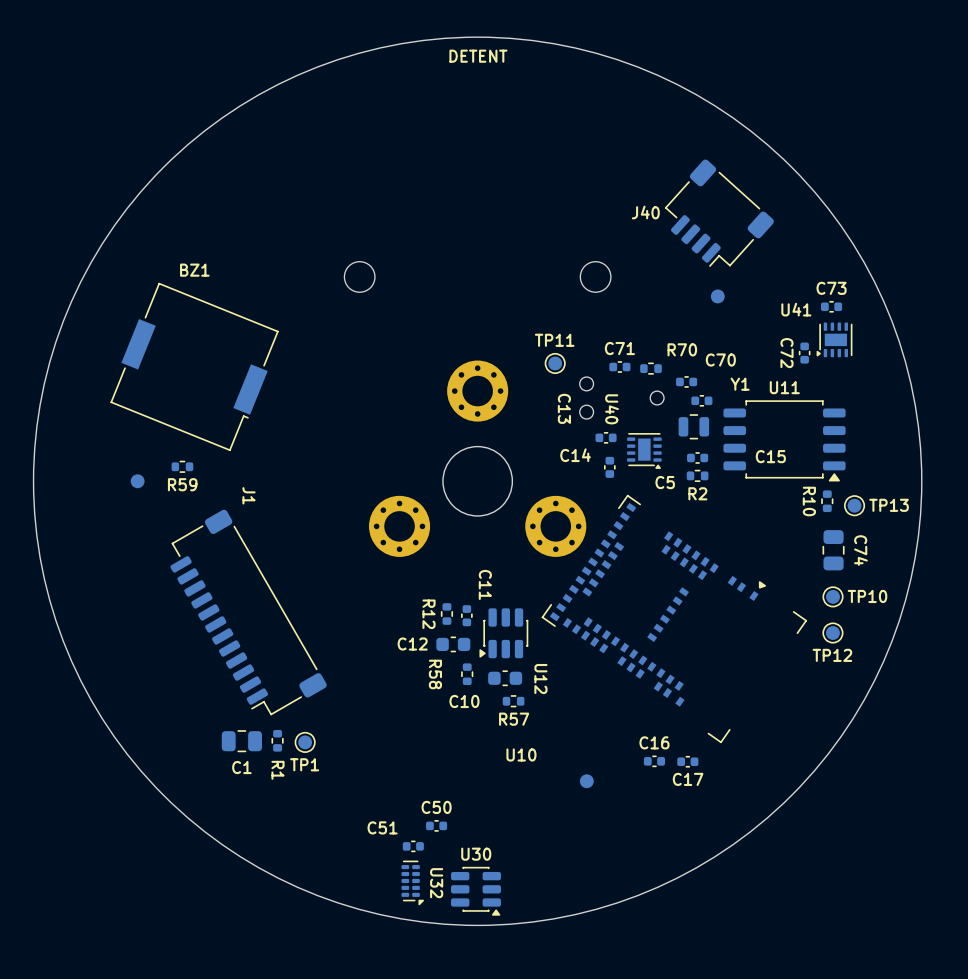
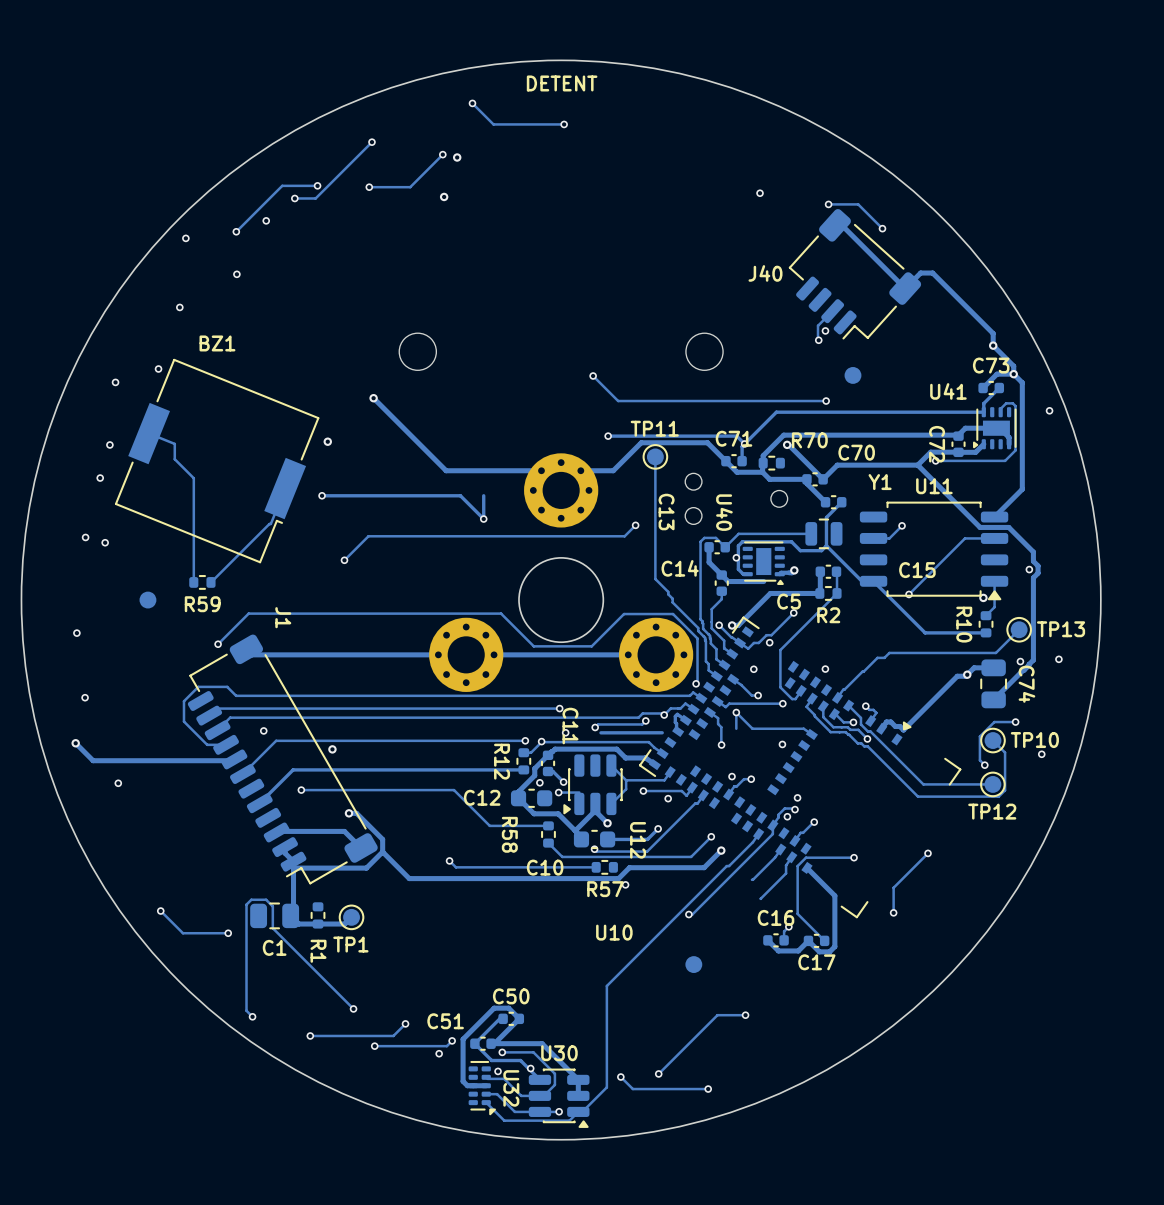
track: none -> (472, 103) (493, 124) (564, 124)
via: none -> (472, 103)
via: none -> (564, 124)
track: none -> (371, 142) (315, 198) (294, 198)
via: none -> (371, 142)
track: none -> (442, 154) (410, 187) (369, 187)
via: none -> (442, 154)
via: none -> (457, 157)
track: none -> (317, 185) (282, 185) (236, 231)
via: none -> (317, 185)
via: none -> (369, 187)
via: none -> (760, 193)
via: none -> (444, 196)
via: none -> (294, 198)
track: none -> (828, 204) (858, 204) (882, 228)
via: none -> (828, 204)
via: none -> (266, 220)
track: none -> (834, 225) (841, 225) (905, 288) (920, 273) (932, 273) (993, 333) (993, 345) (1013, 366) (1013, 374)
via: none -> (882, 228)
via: none -> (236, 231)
via: none -> (185, 238)
via: none -> (236, 274)
via: none -> (179, 307)
track: none -> (832, 311) (818, 325) (818, 340)
via: none -> (825, 330)
via: none -> (818, 340)
via: none -> (993, 345)
via: none -> (158, 369)
track: none -> (1013, 374) (1022, 382) (1022, 489) (994, 517)
track: none -> (1013, 374) (996, 374) (983, 388)
via: none -> (1013, 374)
track: none -> (593, 375) (618, 401) (826, 401)
via: none -> (593, 375)
via: none -> (115, 382)
track: none -> (999, 388) (983, 403) (983, 412) (776, 412) (742, 446) (742, 461)
track: none -> (373, 398) (446, 470) (541, 470) (549, 462) (561, 462)
via: none -> (373, 398)
via: none -> (826, 401)
via: none -> (1049, 410)
track: none -> (1000, 412) (1000, 408) (1006, 403) (1012, 403) (1015, 406) (1015, 450) (1005, 460) (935, 460)
track: none -> (149, 433) (174, 443) (174, 459) (193, 478) (193, 582)
track: none -> (958, 435) (783, 435) (763, 455) (762, 472)
track: none -> (958, 435) (965, 428) (999, 428) (1009, 437) (1009, 444)
track: none -> (608, 436) (736, 436) (744, 443)
via: none -> (608, 436)
via: none -> (327, 441)
via: none -> (744, 443)
via: none -> (109, 444)
track: none -> (787, 444) (823, 479) (837, 465) (917, 465)
via: none -> (787, 444)
track: none -> (983, 444) (975, 452) (958, 452)
track: none -> (958, 452) (930, 452) (917, 465)
track: none -> (655, 456) (655, 579) (668, 591) (672, 602) (698, 628) (698, 630) (705, 637) (705, 661) (708, 664) (708, 670) (716, 676)
via: none -> (935, 460)
track: none -> (917, 465) (980, 527) (1008, 527) (1033, 552) (1033, 561) (1038, 565) (1038, 573) (1033, 577) (1033, 660) (993, 699)
track: none -> (580, 470) (613, 470) (641, 442) (707, 442) (736, 472) (762, 472)
track: none -> (762, 472) (769, 479) (806, 479) (806, 483) (825, 502)
via: none -> (100, 478)
track: none -> (285, 488) (270, 523) (211, 582)
via: none -> (322, 495)
track: none -> (483, 495) (483, 519) (460, 495) (322, 495)
track: none -> (841, 502) (826, 517) (826, 545)
via: none -> (483, 519)
track: none -> (635, 525) (624, 536) (368, 536) (344, 560)
via: none -> (635, 525)
track: none -> (902, 525) (889, 538) (873, 538)
via: none -> (902, 525)
track: none -> (811, 533) (738, 533) (725, 547) (715, 537) (704, 537) (700, 541) (700, 619) (703, 628) (710, 635) (710, 643) (716, 649) (716, 659) (724, 665)
via: none -> (85, 537)
track: none -> (994, 538) (965, 538) (909, 594)
via: none -> (105, 542)
track: none -> (826, 545) (821, 550) (800, 550) (791, 541) (742, 541) (738, 545) (738, 569) (743, 574) (747, 574)
track: none -> (826, 545) (861, 581) (873, 581) (925, 632) (986, 632)
track: none -> (709, 547) (709, 562) (728, 581) (763, 581)
via: none -> (736, 557)
via: none -> (344, 560)
track: none -> (794, 570) (791, 572) (779, 574)
via: none -> (794, 570)
via: none -> (1029, 569)
track: none -> (820, 571) (819, 593) (770, 593) (738, 625) (732, 625)
track: none -> (836, 571) (837, 593) (780, 650) (780, 687) (792, 699) (795, 699) (801, 690)
track: none -> (994, 581) (994, 607) (986, 615)
track: none -> (721, 591) (721, 599) (711, 609) (711, 628) (724, 640) (724, 648) (732, 654)
via: none -> (909, 594)
via: none -> (983, 597)
track: none -> (793, 612) (771, 635) (766, 635) (758, 642) (753, 642) (748, 648) (731, 637) (719, 625)
via: none -> (793, 612)
via: none -> (719, 625)
via: none -> (732, 625)
track: none -> (1019, 629) (995, 652) (889, 652) (884, 657) (877, 657) (843, 689) (837, 697)
via: none -> (76, 633)
via: none -> (769, 642)
track: none -> (218, 644) (248, 613) (501, 613) (533, 646) (591, 646) (624, 614) (673, 614) (697, 638) (696, 683)
via: none -> (218, 644)
track: none -> (246, 649) (251, 654) (466, 654)
track: none -> (656, 654) (494, 654)
via: none -> (1058, 659)
via: none -> (1020, 661)
track: none -> (993, 667) (974, 667) (965, 676) (957, 676) (903, 730) (890, 721) (886, 721) (881, 728)
via: none -> (753, 669)
via: none -> (825, 669)
via: none -> (967, 674)
track: none -> (733, 679) (751, 695) (758, 695)
via: none -> (696, 683)
via: none -> (758, 695)
via: none -> (85, 697)
track: none -> (701, 698) (693, 692) (689, 695) (236, 695) (227, 686) (198, 686) (183, 701) (183, 721) (207, 744) (226, 744)
track: none -> (812, 698) (806, 706) (830, 732) (845, 732) (857, 743) (867, 746) (917, 796) (998, 796) (1005, 790) (1005, 752) (992, 740)
track: none -> (717, 701) (725, 707) (729, 703) (782, 703)
via: none -> (782, 703)
track: none -> (823, 706) (823, 717) (833, 727) (858, 729) (867, 738)
track: none -> (848, 705) (860, 717) (860, 724) (867, 731) (870, 731) (923, 784) (992, 784)
track: none -> (865, 706) (876, 712) (870, 721)
via: none -> (865, 706)
track: none -> (559, 708) (216, 708) (209, 715)
via: none -> (559, 708)
track: none -> (693, 709) (685, 703) (680, 708) (670, 708) (664, 715) (642, 713) (638, 717) (230, 717) (217, 730)
track: none -> (709, 712) (718, 718) (718, 724) (721, 727) (721, 744)
via: none -> (736, 712)
via: none -> (664, 715)
track: none -> (834, 714) (843, 722) (853, 722)
track: none -> (645, 720) (642, 724) (598, 724) (595, 727)
via: none -> (645, 720)
track: none -> (685, 720) (677, 714) (675, 716) (678, 731)
via: none -> (853, 722)
track: none -> (1015, 722) (994, 722) (979, 736) (979, 760) (984, 765)
via: none -> (1015, 722)
via: none -> (595, 727)
track: none -> (736, 728) (736, 712) (752, 728) (803, 728) (811, 734)
via: none -> (263, 730)
via: none -> (565, 732)
track: none -> (662, 732) (600, 732)
via: none -> (867, 738)
track: none -> (525, 740) (276, 740) (242, 774)
via: none -> (525, 740)
via: none -> (541, 741)
track: none -> (541, 742) (531, 752) (523, 752)
track: none -> (541, 742) (648, 742) (662, 753)
track: none -> (75, 743) (93, 760) (234, 759)
via: none -> (75, 743)
via: none -> (721, 745)
via: none -> (782, 744)
via: none -> (332, 749)
via: none -> (1041, 754)
track: none -> (654, 764) (645, 757) (625, 757) (616, 749) (555, 749) (534, 768) (534, 775) (518, 791) (518, 798) (534, 813) (558, 813) (581, 837) (581, 839)
track: none -> (611, 765) (626, 780)
via: none -> (984, 765)
track: none -> (523, 769) (293, 769) (259, 803)
track: none -> (548, 771) (552, 771) (563, 782)
track: none -> (670, 772) (664, 780) (626, 780)
via: none -> (732, 776)
track: none -> (751, 779) (744, 779) (734, 786) (728, 794)
via: none -> (751, 779)
track: none -> (626, 780) (626, 789) (611, 803)
via: none -> (539, 782)
via: none -> (563, 782)
via: none -> (118, 783)
track: none -> (692, 787) (686, 795) (681, 791) (643, 791)
track: none -> (301, 790) (454, 790) (489, 825) (548, 825)
via: none -> (301, 790)
via: none -> (643, 791)
via: none -> (558, 792)
track: none -> (579, 792) (558, 792)
track: none -> (703, 795) (697, 803) (695, 803) (647, 851) (596, 851) (594, 849)
via: none -> (668, 798)
via: none -> (797, 797)
track: none -> (595, 803) (595, 810) (575, 830)
track: none -> (795, 809) (784, 808) (778, 814) (772, 825) (772, 834) (692, 914) (688, 914)
via: none -> (795, 809)
track: none -> (595, 810) (607, 823)
track: none -> (348, 813) (356, 813) (382, 839) (382, 851)
via: none -> (348, 813)
via: none -> (787, 816)
via: none -> (607, 823)
track: none -> (814, 822) (803, 832) (800, 832) (794, 840)
via: none -> (814, 822)
track: none -> (658, 828) (647, 839) (607, 839)
via: none -> (658, 828)
track: none -> (276, 832) (344, 831) (361, 847)
track: none -> (758, 834) (752, 842) (606, 986) (606, 1087) (582, 1111) (578, 1111) (569, 1120) (504, 1120) (486, 1102)
track: none -> (711, 836) (691, 856) (562, 856) (548, 843)
via: none -> (711, 836)
track: none -> (285, 847) (285, 853) (293, 861) (293, 913) (290, 915) (298, 924) (344, 924) (351, 917)
via: none -> (594, 849)
track: none -> (780, 849) (751, 879)
track: none -> (721, 850) (704, 867) (629, 867) (618, 878) (409, 878) (382, 851)
via: none -> (721, 850)
track: none -> (382, 851) (366, 868) (293, 868)
track: none -> (928, 853) (893, 887) (893, 912)
via: none -> (928, 853)
track: none -> (791, 857) (786, 865) (786, 873) (760, 898)
track: none -> (854, 857) (806, 857) (797, 866) (797, 913) (824, 940)
via: none -> (854, 857)
track: none -> (449, 860) (455, 867) (596, 867)
via: none -> (449, 860)
track: none -> (806, 867) (834, 895) (834, 946) (829, 951) (819, 951) (808, 940) (798, 950) (778, 950) (767, 940)
via: none -> (625, 884)
track: none -> (160, 911) (182, 933) (228, 933)
via: none -> (160, 911)
via: none -> (893, 912)
via: none -> (688, 914)
track: none -> (788, 926) (784, 931) (784, 940)
via: none -> (788, 926)
via: none -> (228, 933)
track: none -> (353, 1008) (272, 928) (272, 906) (266, 899) (251, 899) (246, 904) (246, 1010) (252, 1016)
via: none -> (353, 1008)
track: none -> (745, 1015) (717, 1015) (658, 1073)
via: none -> (745, 1015)
via: none -> (252, 1016)
track: none -> (503, 1018) (499, 1018) (474, 1043) (491, 1060) (520, 1060) (539, 1079)
track: none -> (405, 1023) (393, 1035) (310, 1035)
via: none -> (405, 1023)
via: none -> (310, 1035)
track: none -> (452, 1040) (446, 1046) (374, 1046)
via: none -> (452, 1040)
track: none -> (491, 1043) (494, 1043) (519, 1018) (508, 1008) (494, 1008) (463, 1039) (463, 1081) (467, 1085) (486, 1085)
track: none -> (494, 1043) (542, 1043) (578, 1079) (578, 1095)
via: none -> (374, 1046)
track: none -> (502, 1052) (533, 1052) (554, 1073) (554, 1084) (543, 1095) (521, 1095) (504, 1078) (486, 1077)
via: none -> (502, 1052)
via: none -> (439, 1053)
via: none -> (530, 1068)
via: none -> (498, 1071)
via: none -> (658, 1073)
track: none -> (620, 1077) (632, 1089) (708, 1089)
via: none -> (620, 1077)
via: none -> (708, 1089)
track: none -> (486, 1094) (497, 1094) (514, 1111) (558, 1111)
via: none -> (559, 1111)

